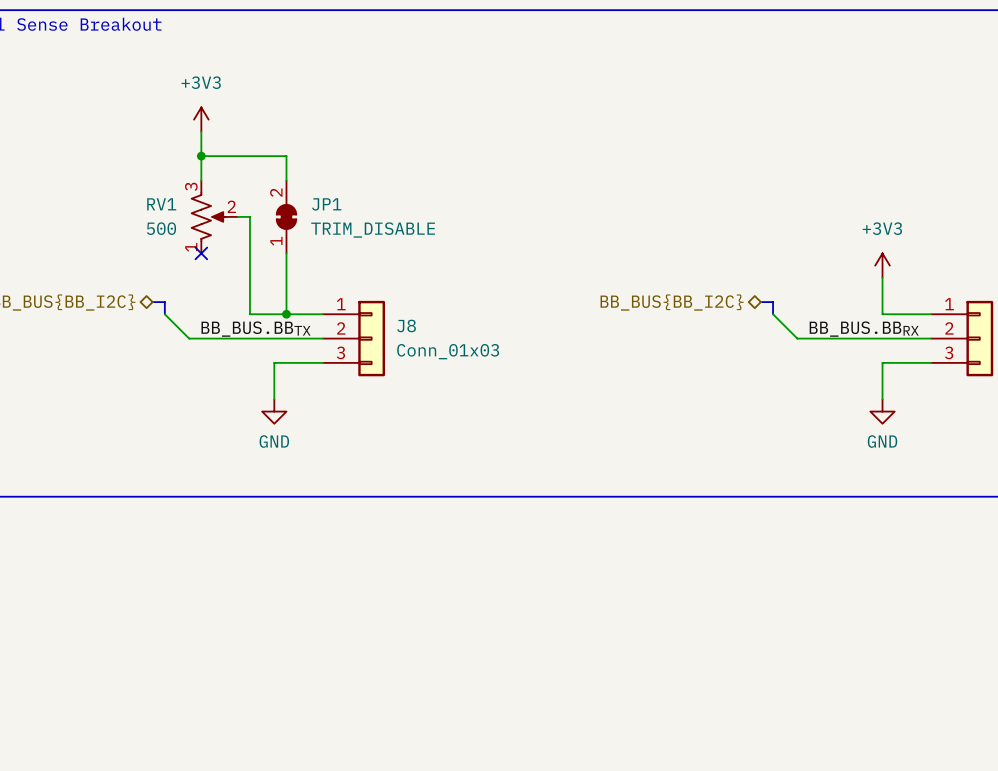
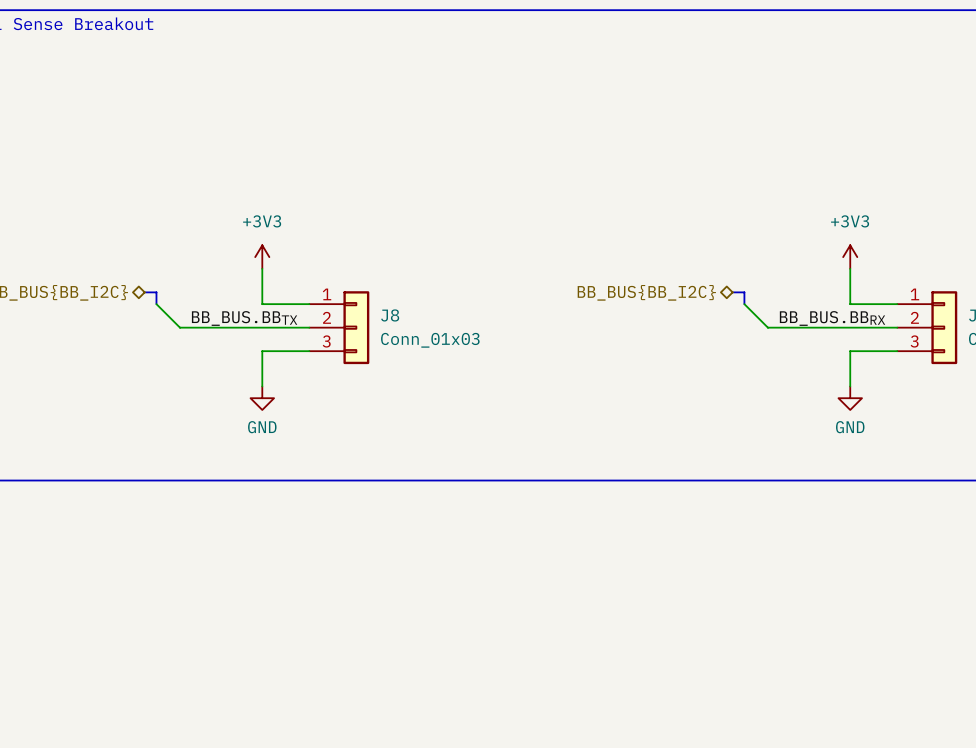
power symbol position: +3V3 (201, 119) -> +3V3 (262, 257)
wire: (201, 131) (201, 180) -> none
wire: (201, 156) (286, 156) (286, 180) -> none
junction: (201, 156) -> none
RV1: 500 (214, 216) -> none
wire: (237, 216) (249, 216) (249, 314) (274, 314) -> (262, 268) (262, 304)
JP1: TRIM_DISABLE (286, 216) -> none
no-connect mark: (201, 253) -> none
wire: (286, 253) (286, 314) -> none
junction: (286, 314) -> none

